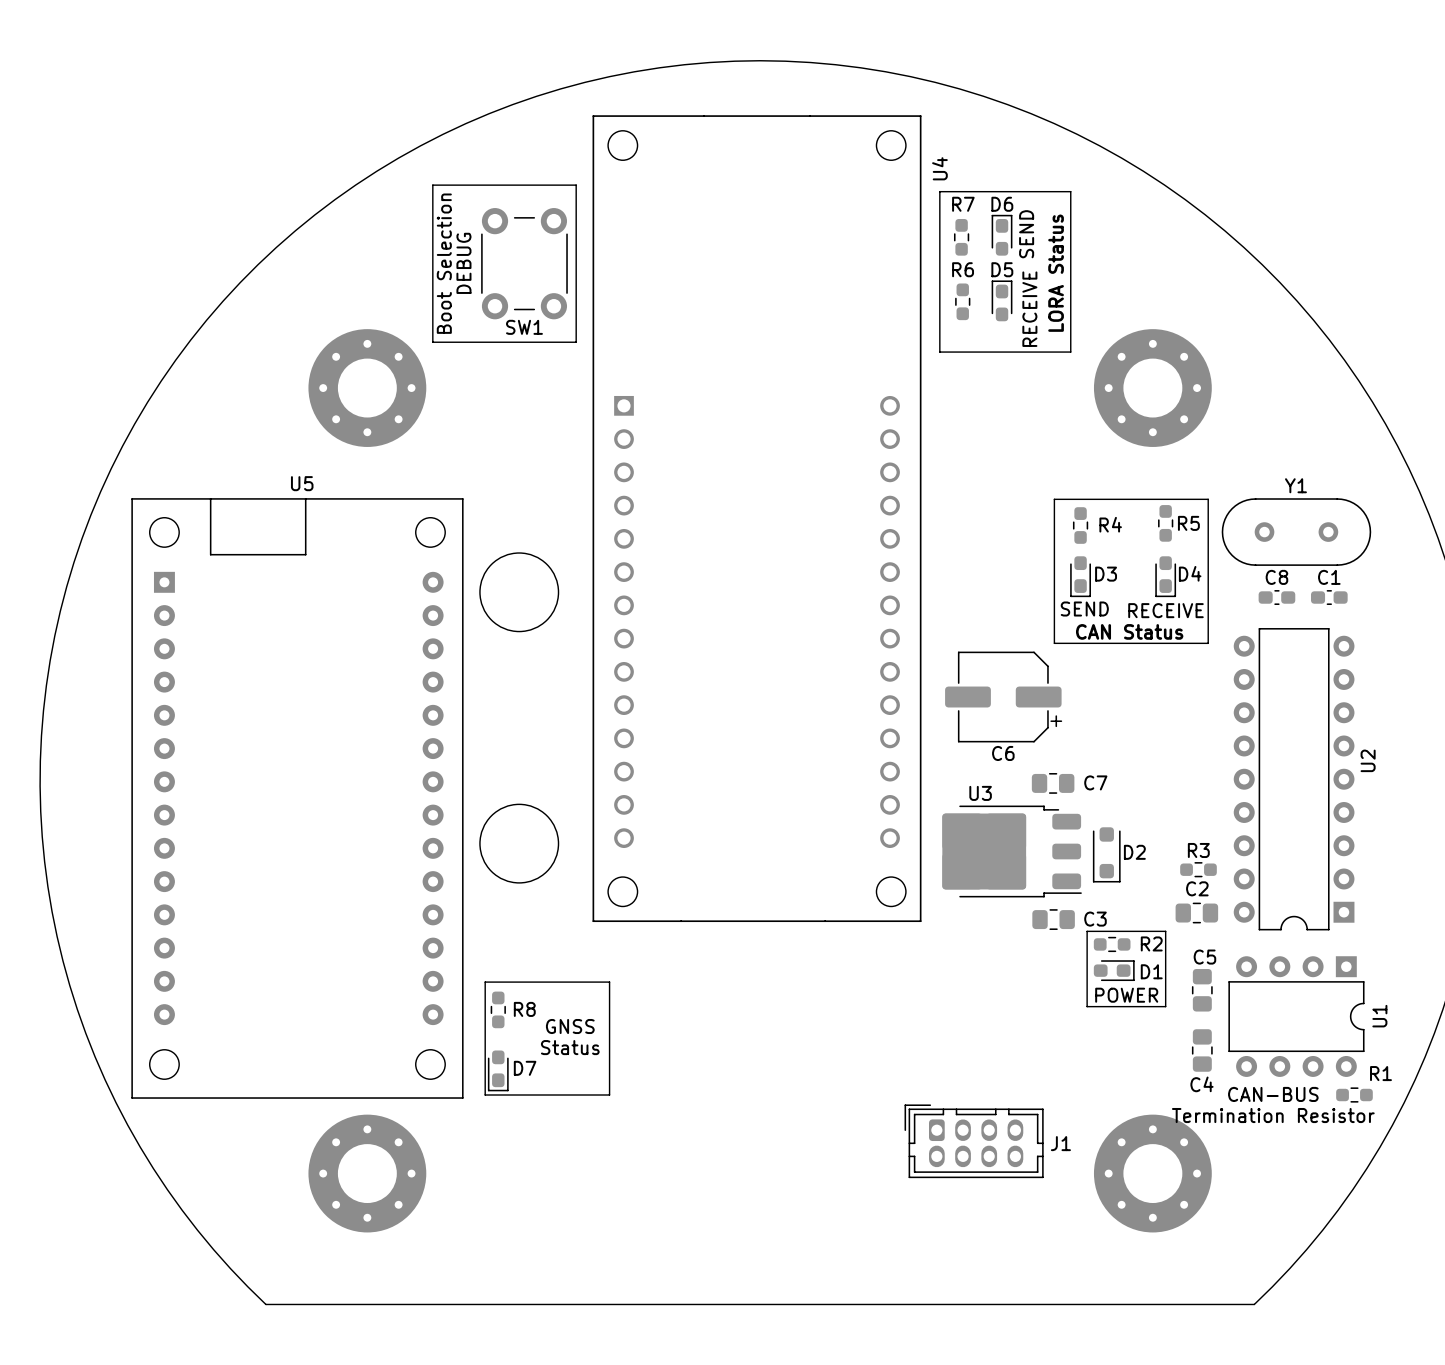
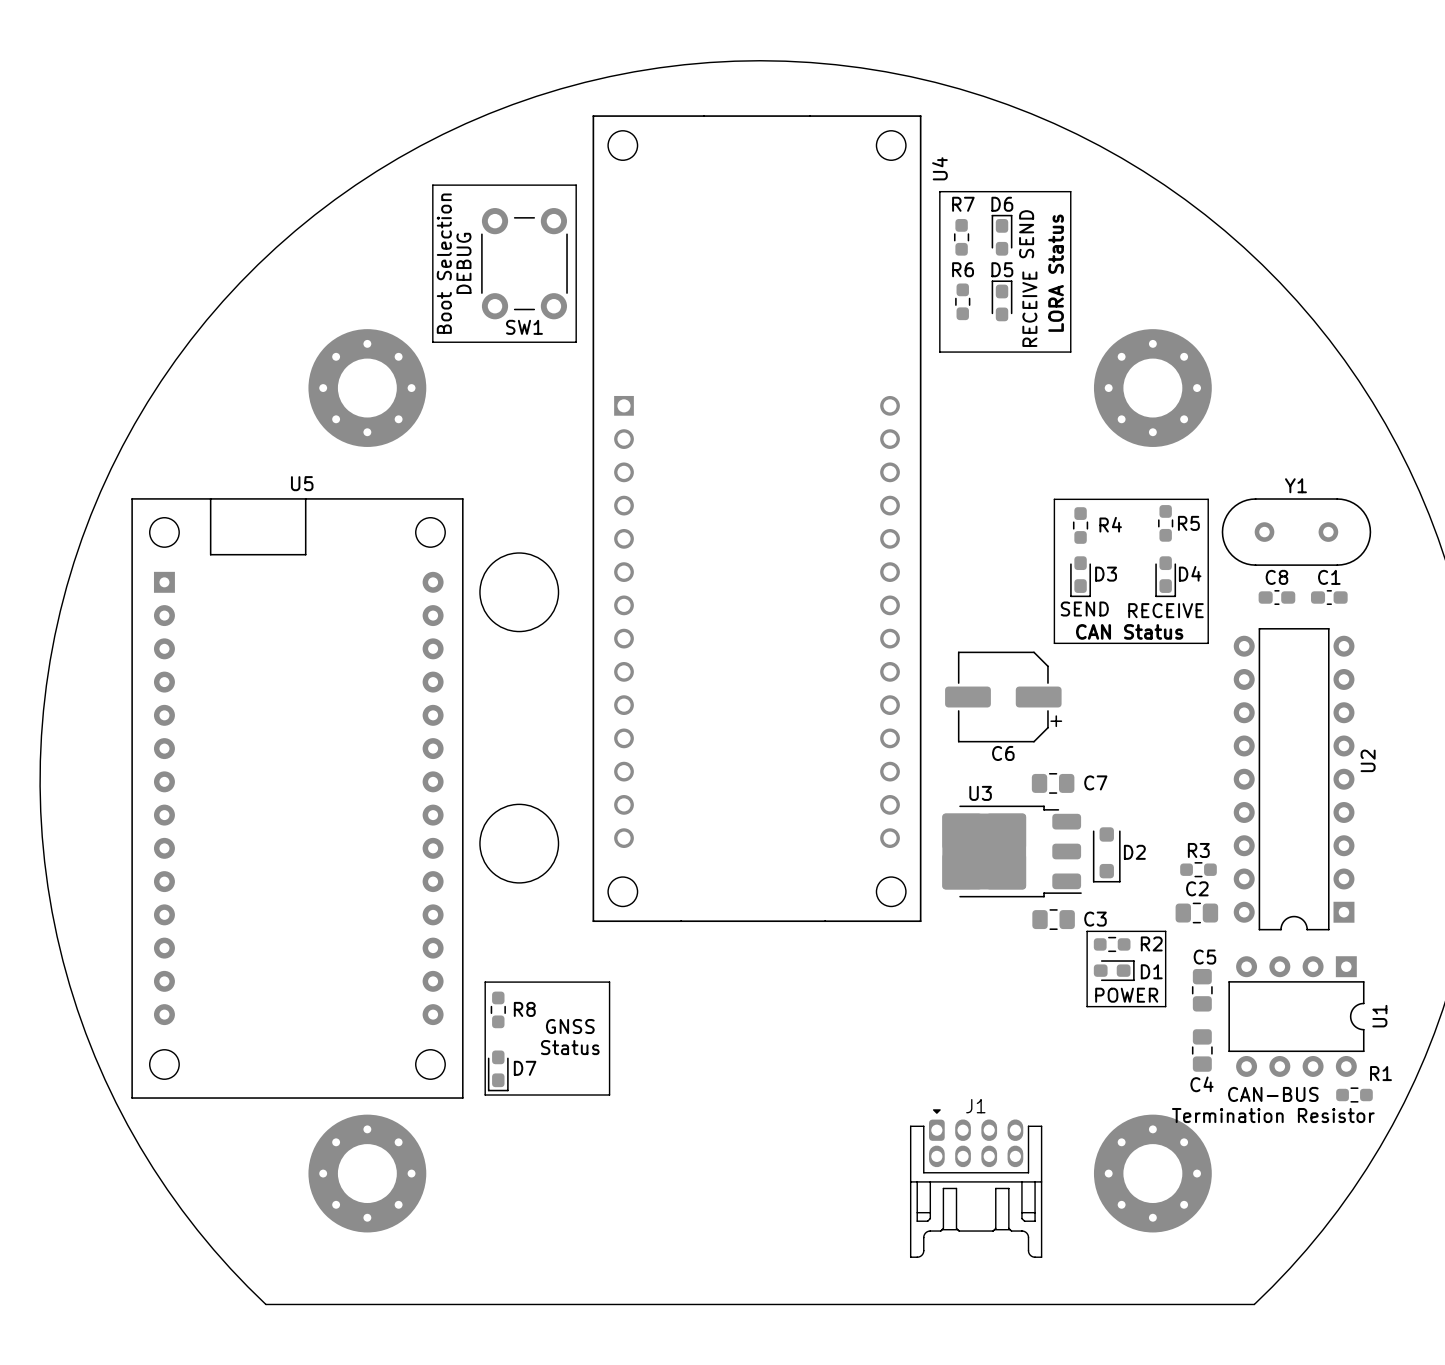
J1 footprint: [904, 1104, 1044, 1179] -> [910, 1109, 1043, 1258]
J1 name position: J1 (1060, 1143) -> J1 (975, 1106)

